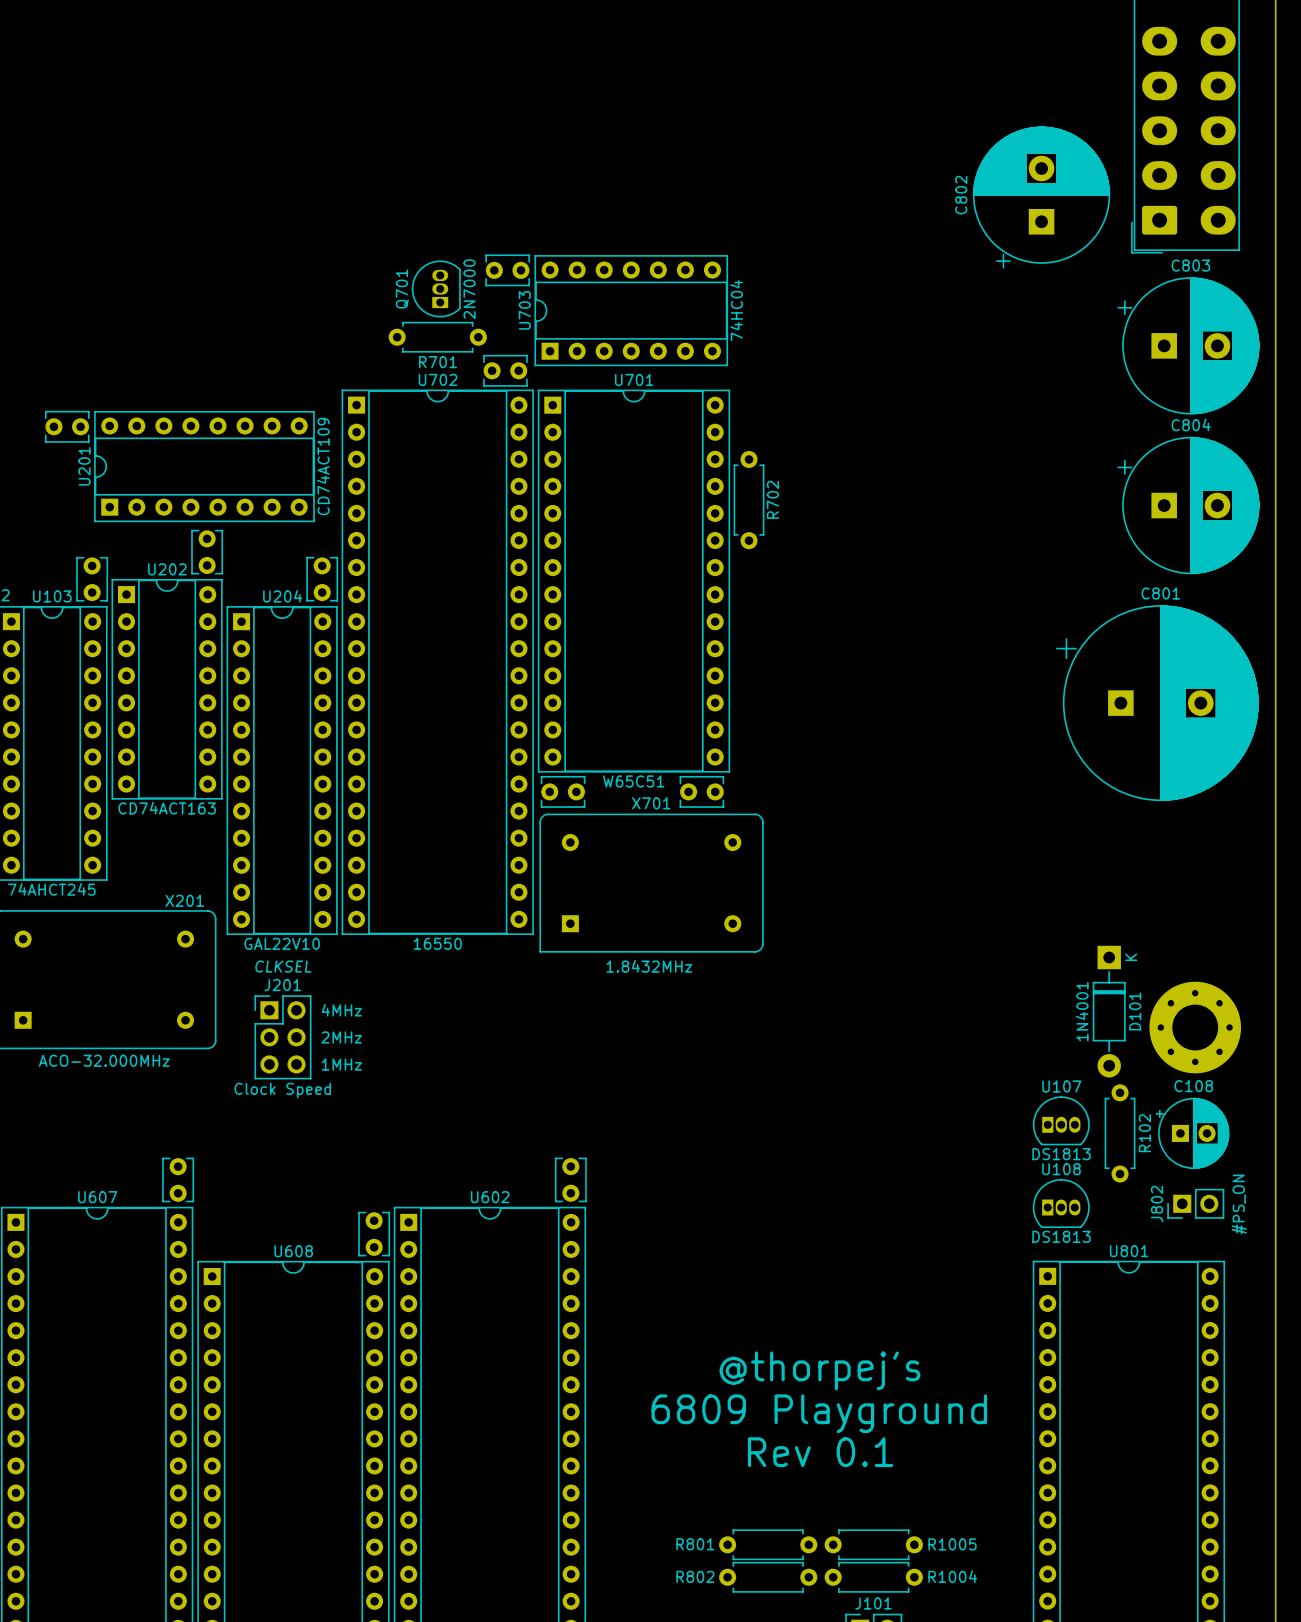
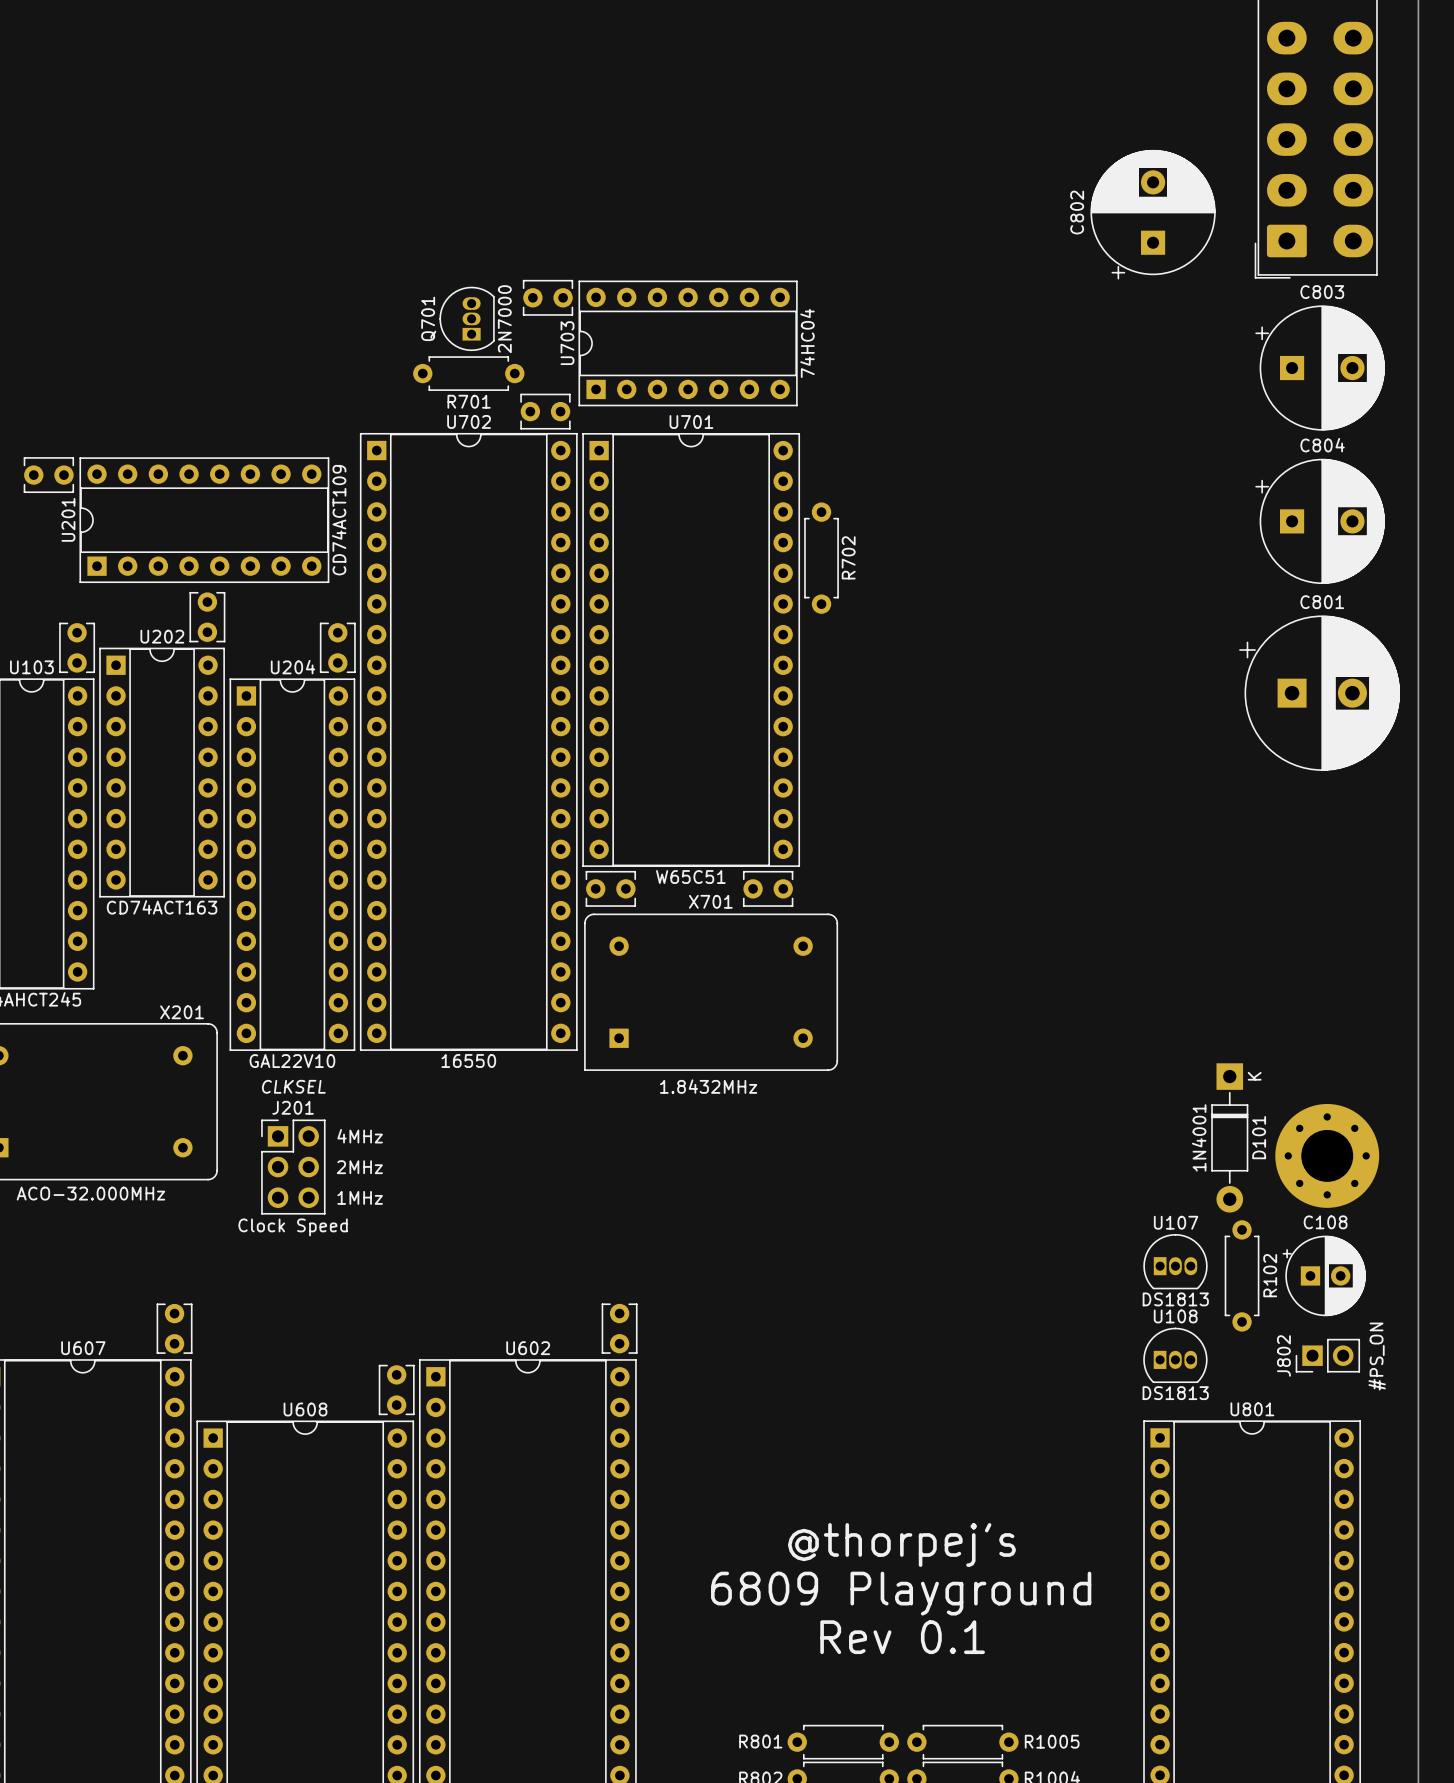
C802 footprint: [973, 126, 1111, 269] -> [1090, 149, 1216, 280]
C803 footprint: [1117, 277, 1260, 415] -> [1255, 305, 1385, 431]
C804 footprint: [1117, 437, 1260, 575] -> [1255, 458, 1385, 584]
C801 name position: C801 (1160, 593) -> C801 (1322, 602)
C801 footprint: [1056, 605, 1259, 801] -> [1239, 615, 1400, 771]

